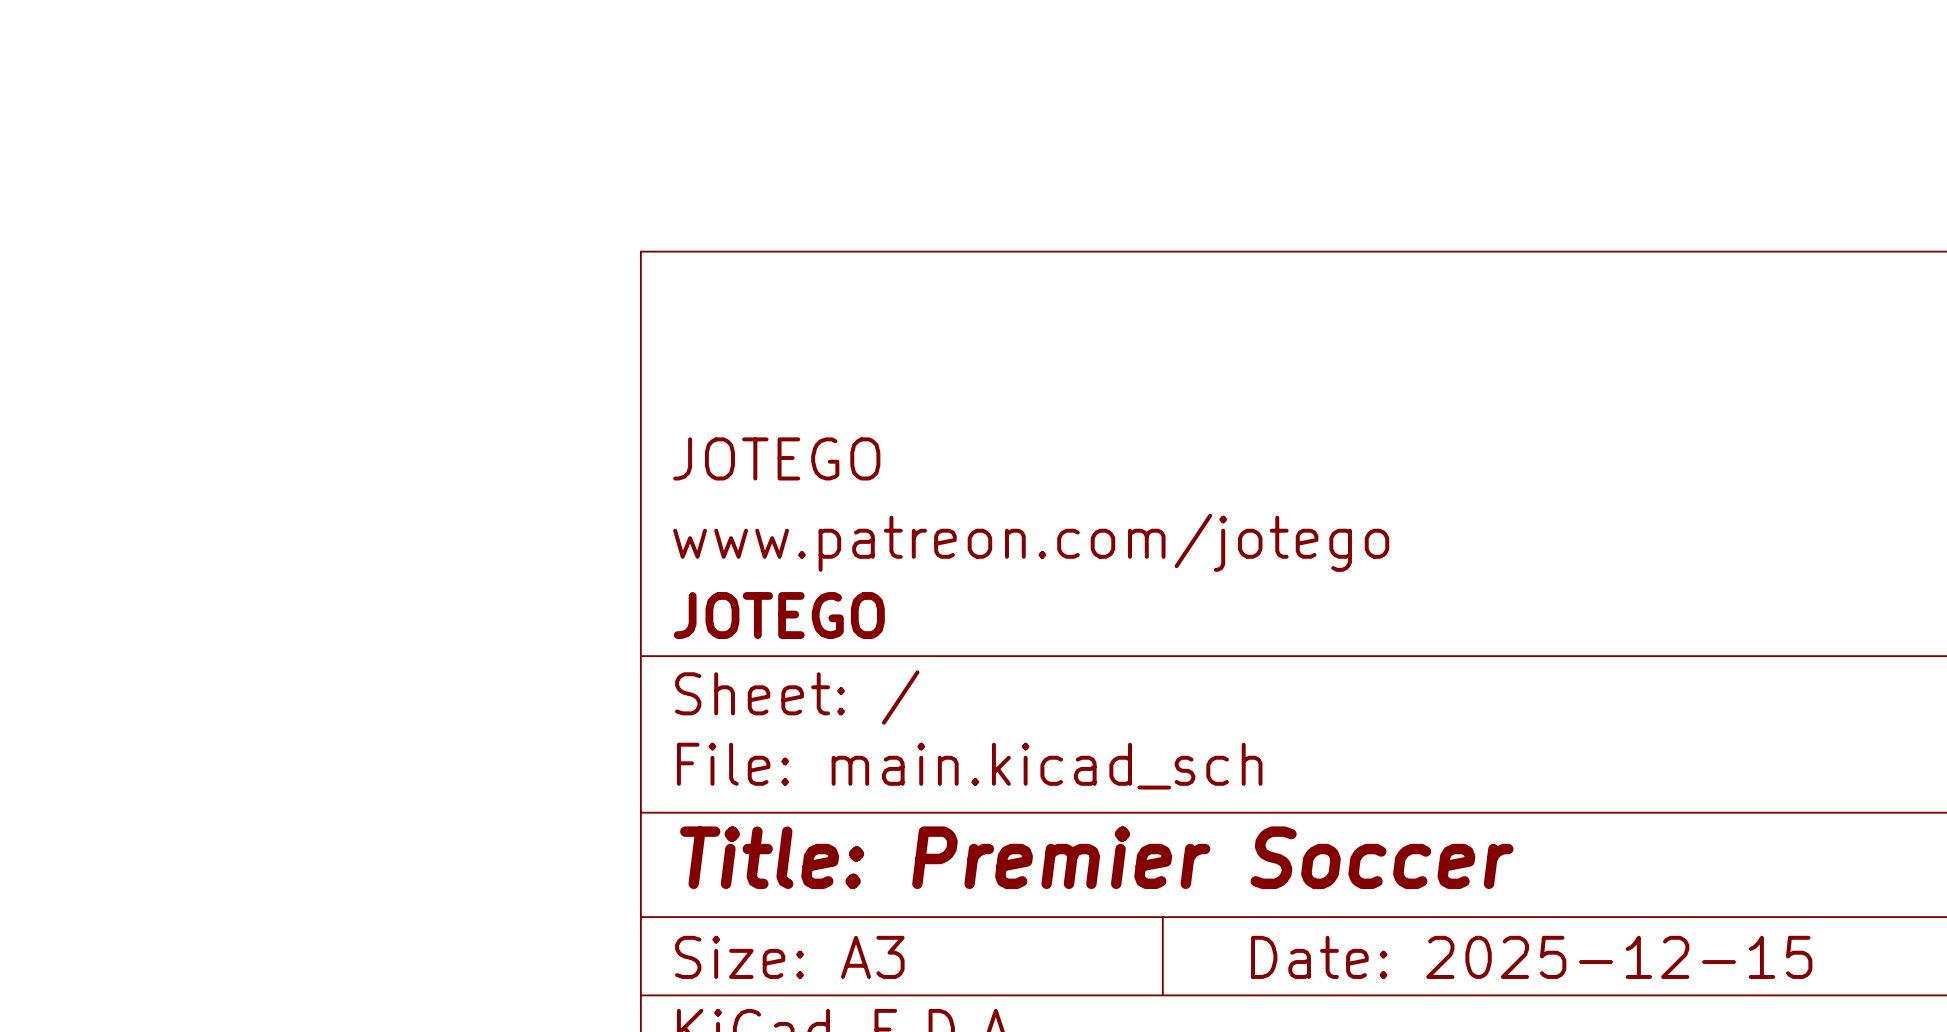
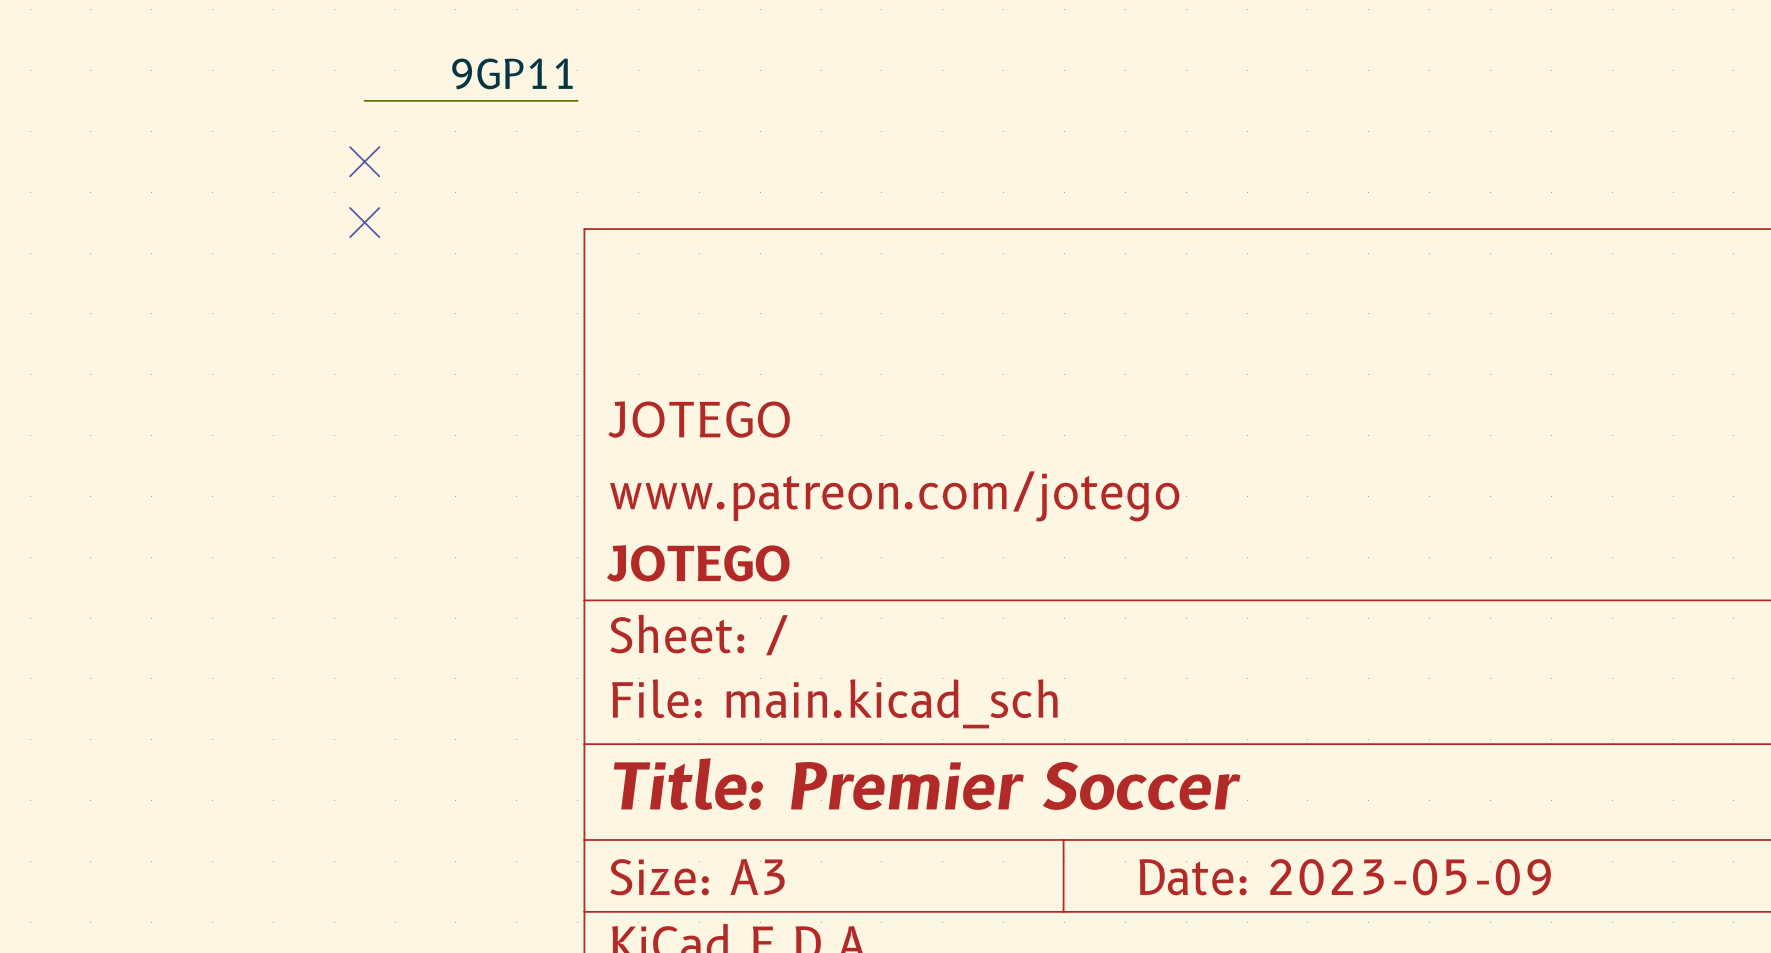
label: none -> 9GP11 (512, 73)
wire: none -> (364, 100) (577, 100)
no-connect mark: none -> (364, 161)
no-connect mark: none -> (364, 222)
title block: Date: 2025-12-15 (1531, 957) -> Date: 2023-05-09 (1345, 877)

